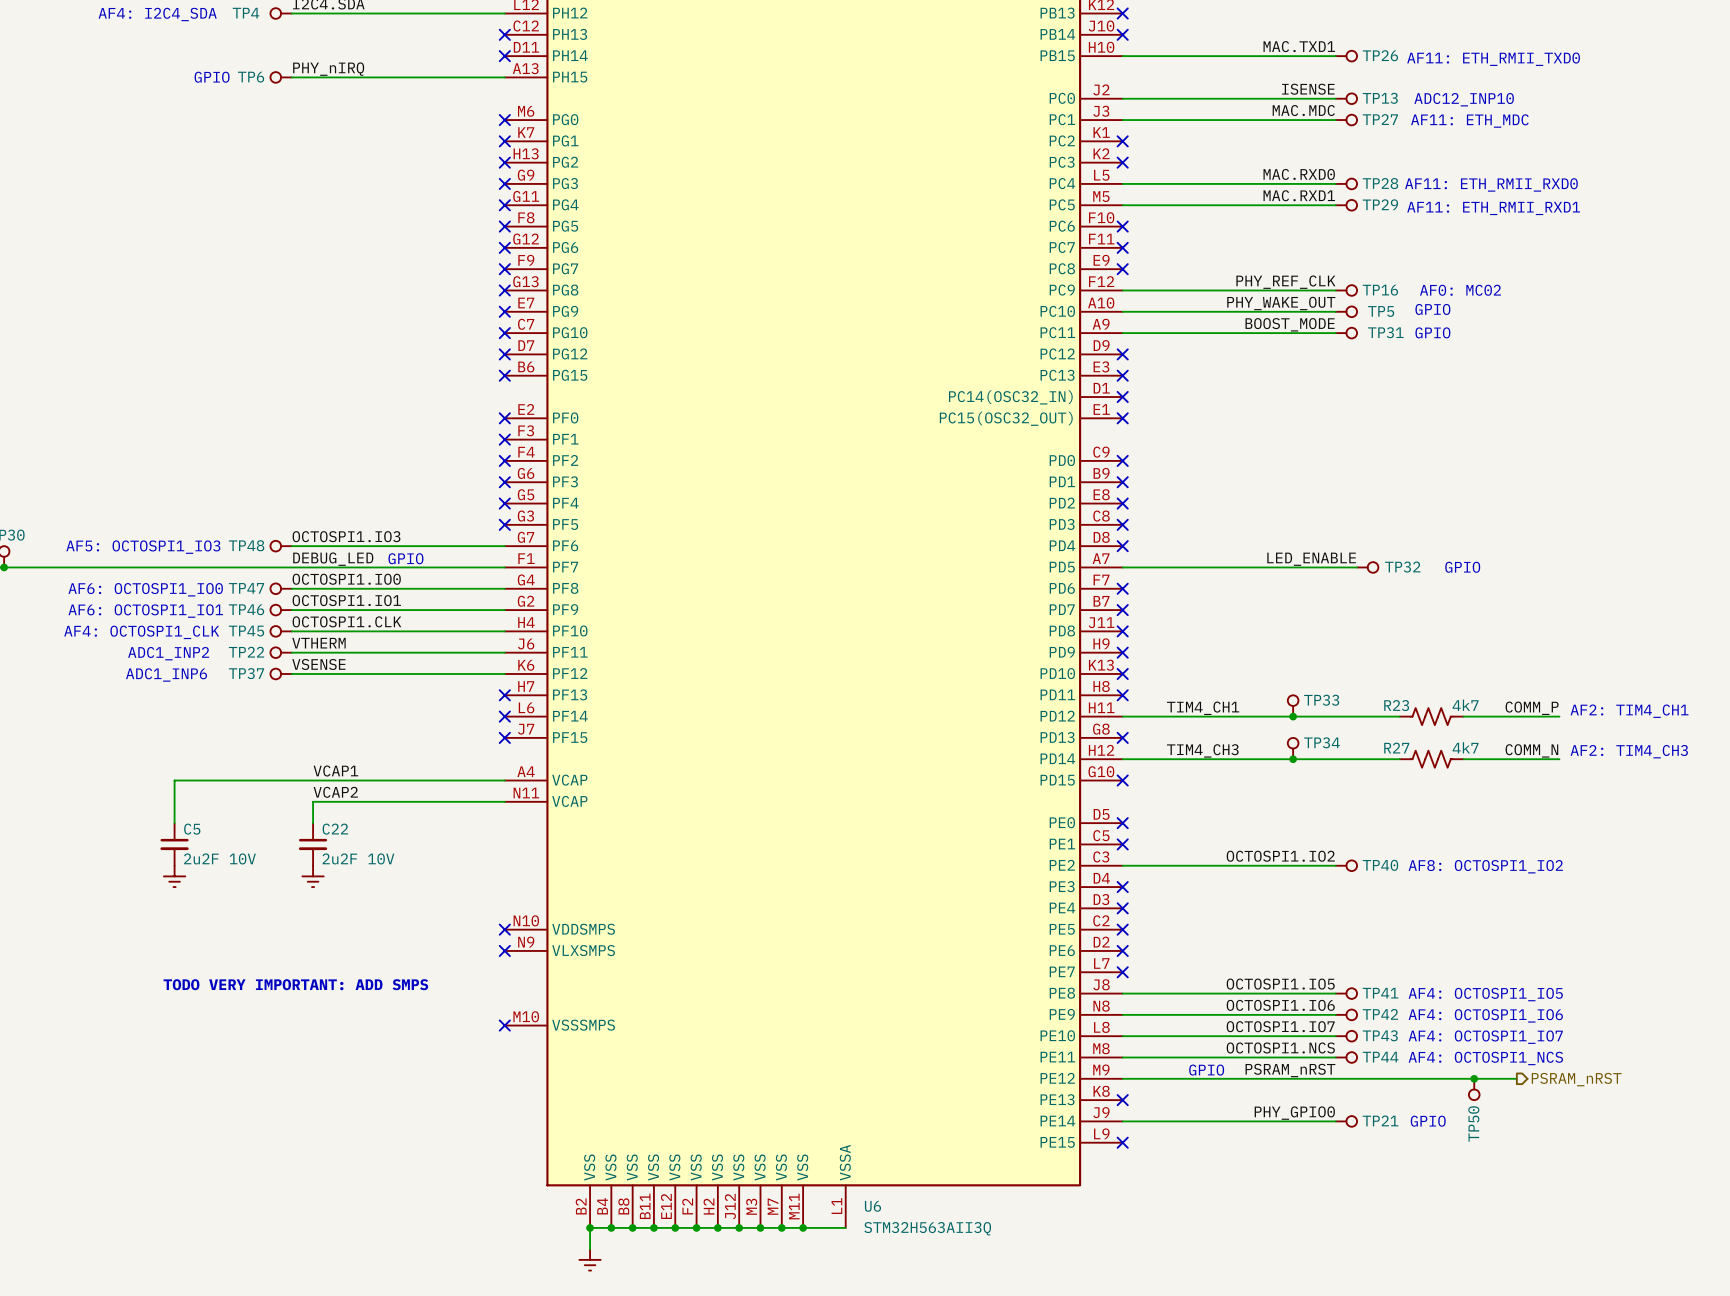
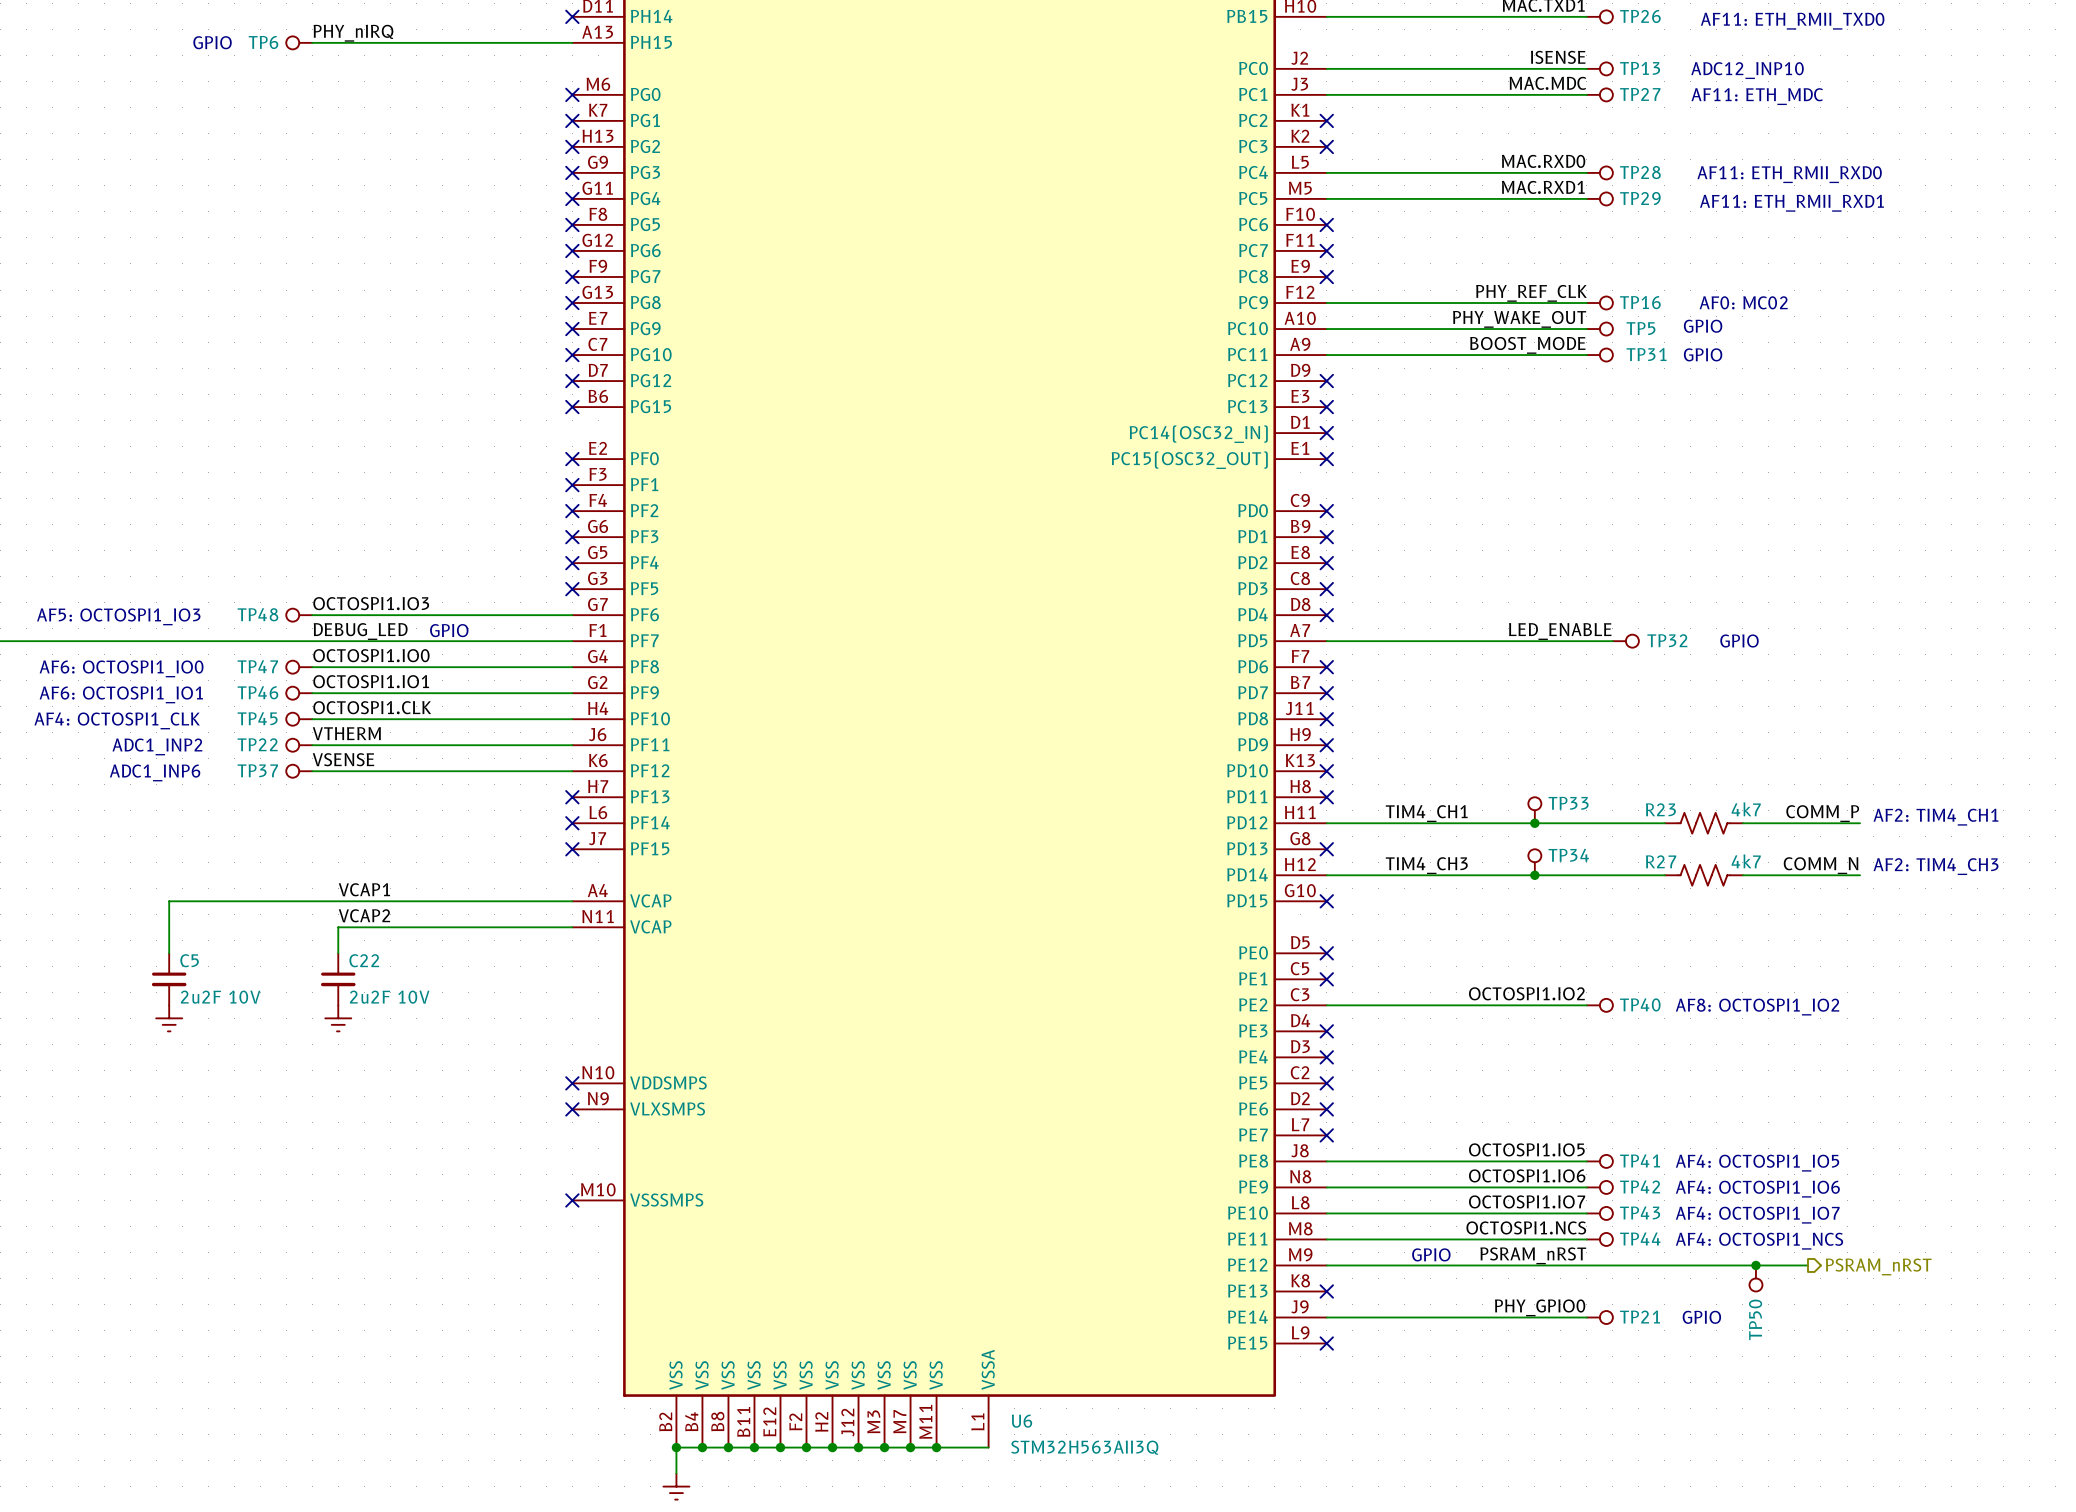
text: TODO VERY IMPORTANT: ADD SMPS (295, 984) -> none

